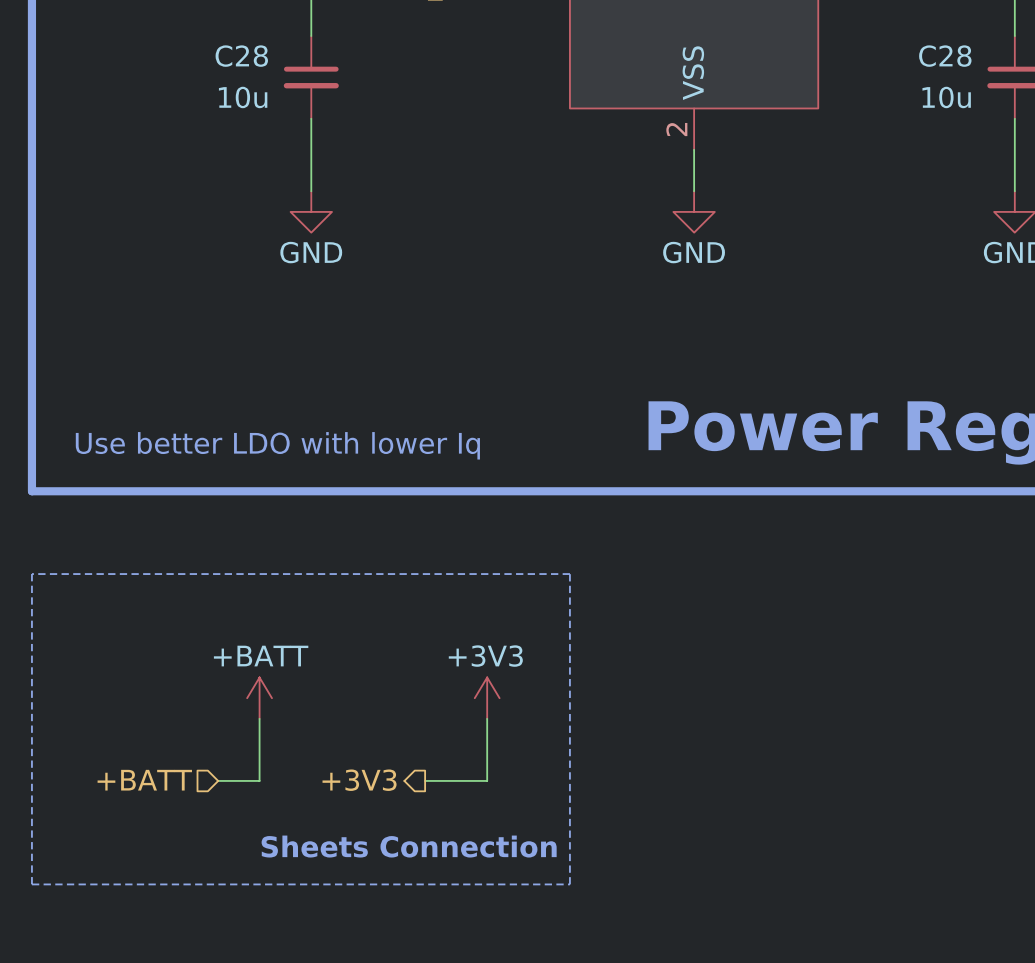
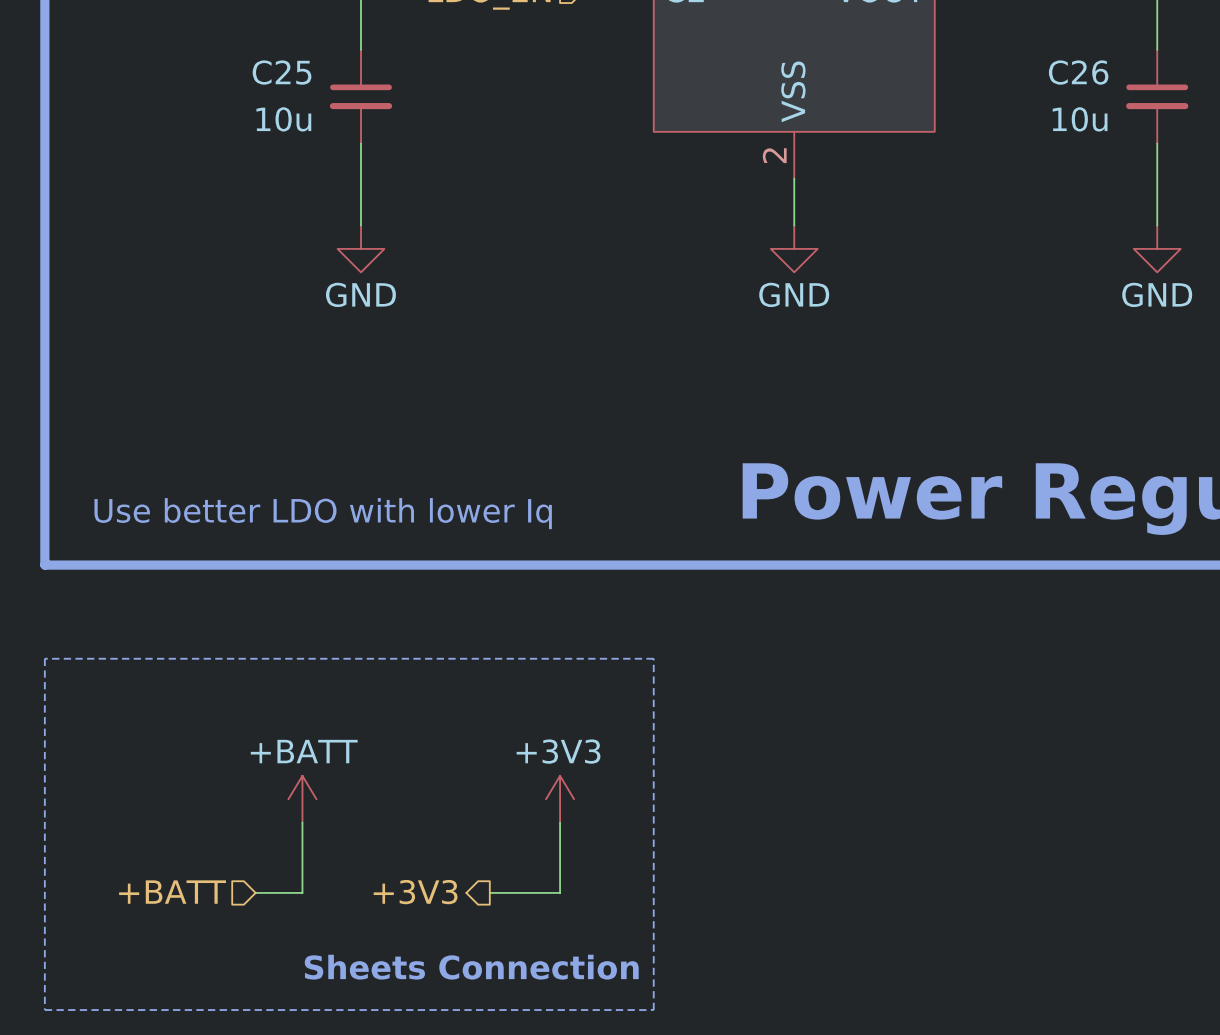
C28 name: C28 (241, 56) -> C25 (282, 72)
C28 name: C28 (945, 56) -> C26 (1078, 72)

